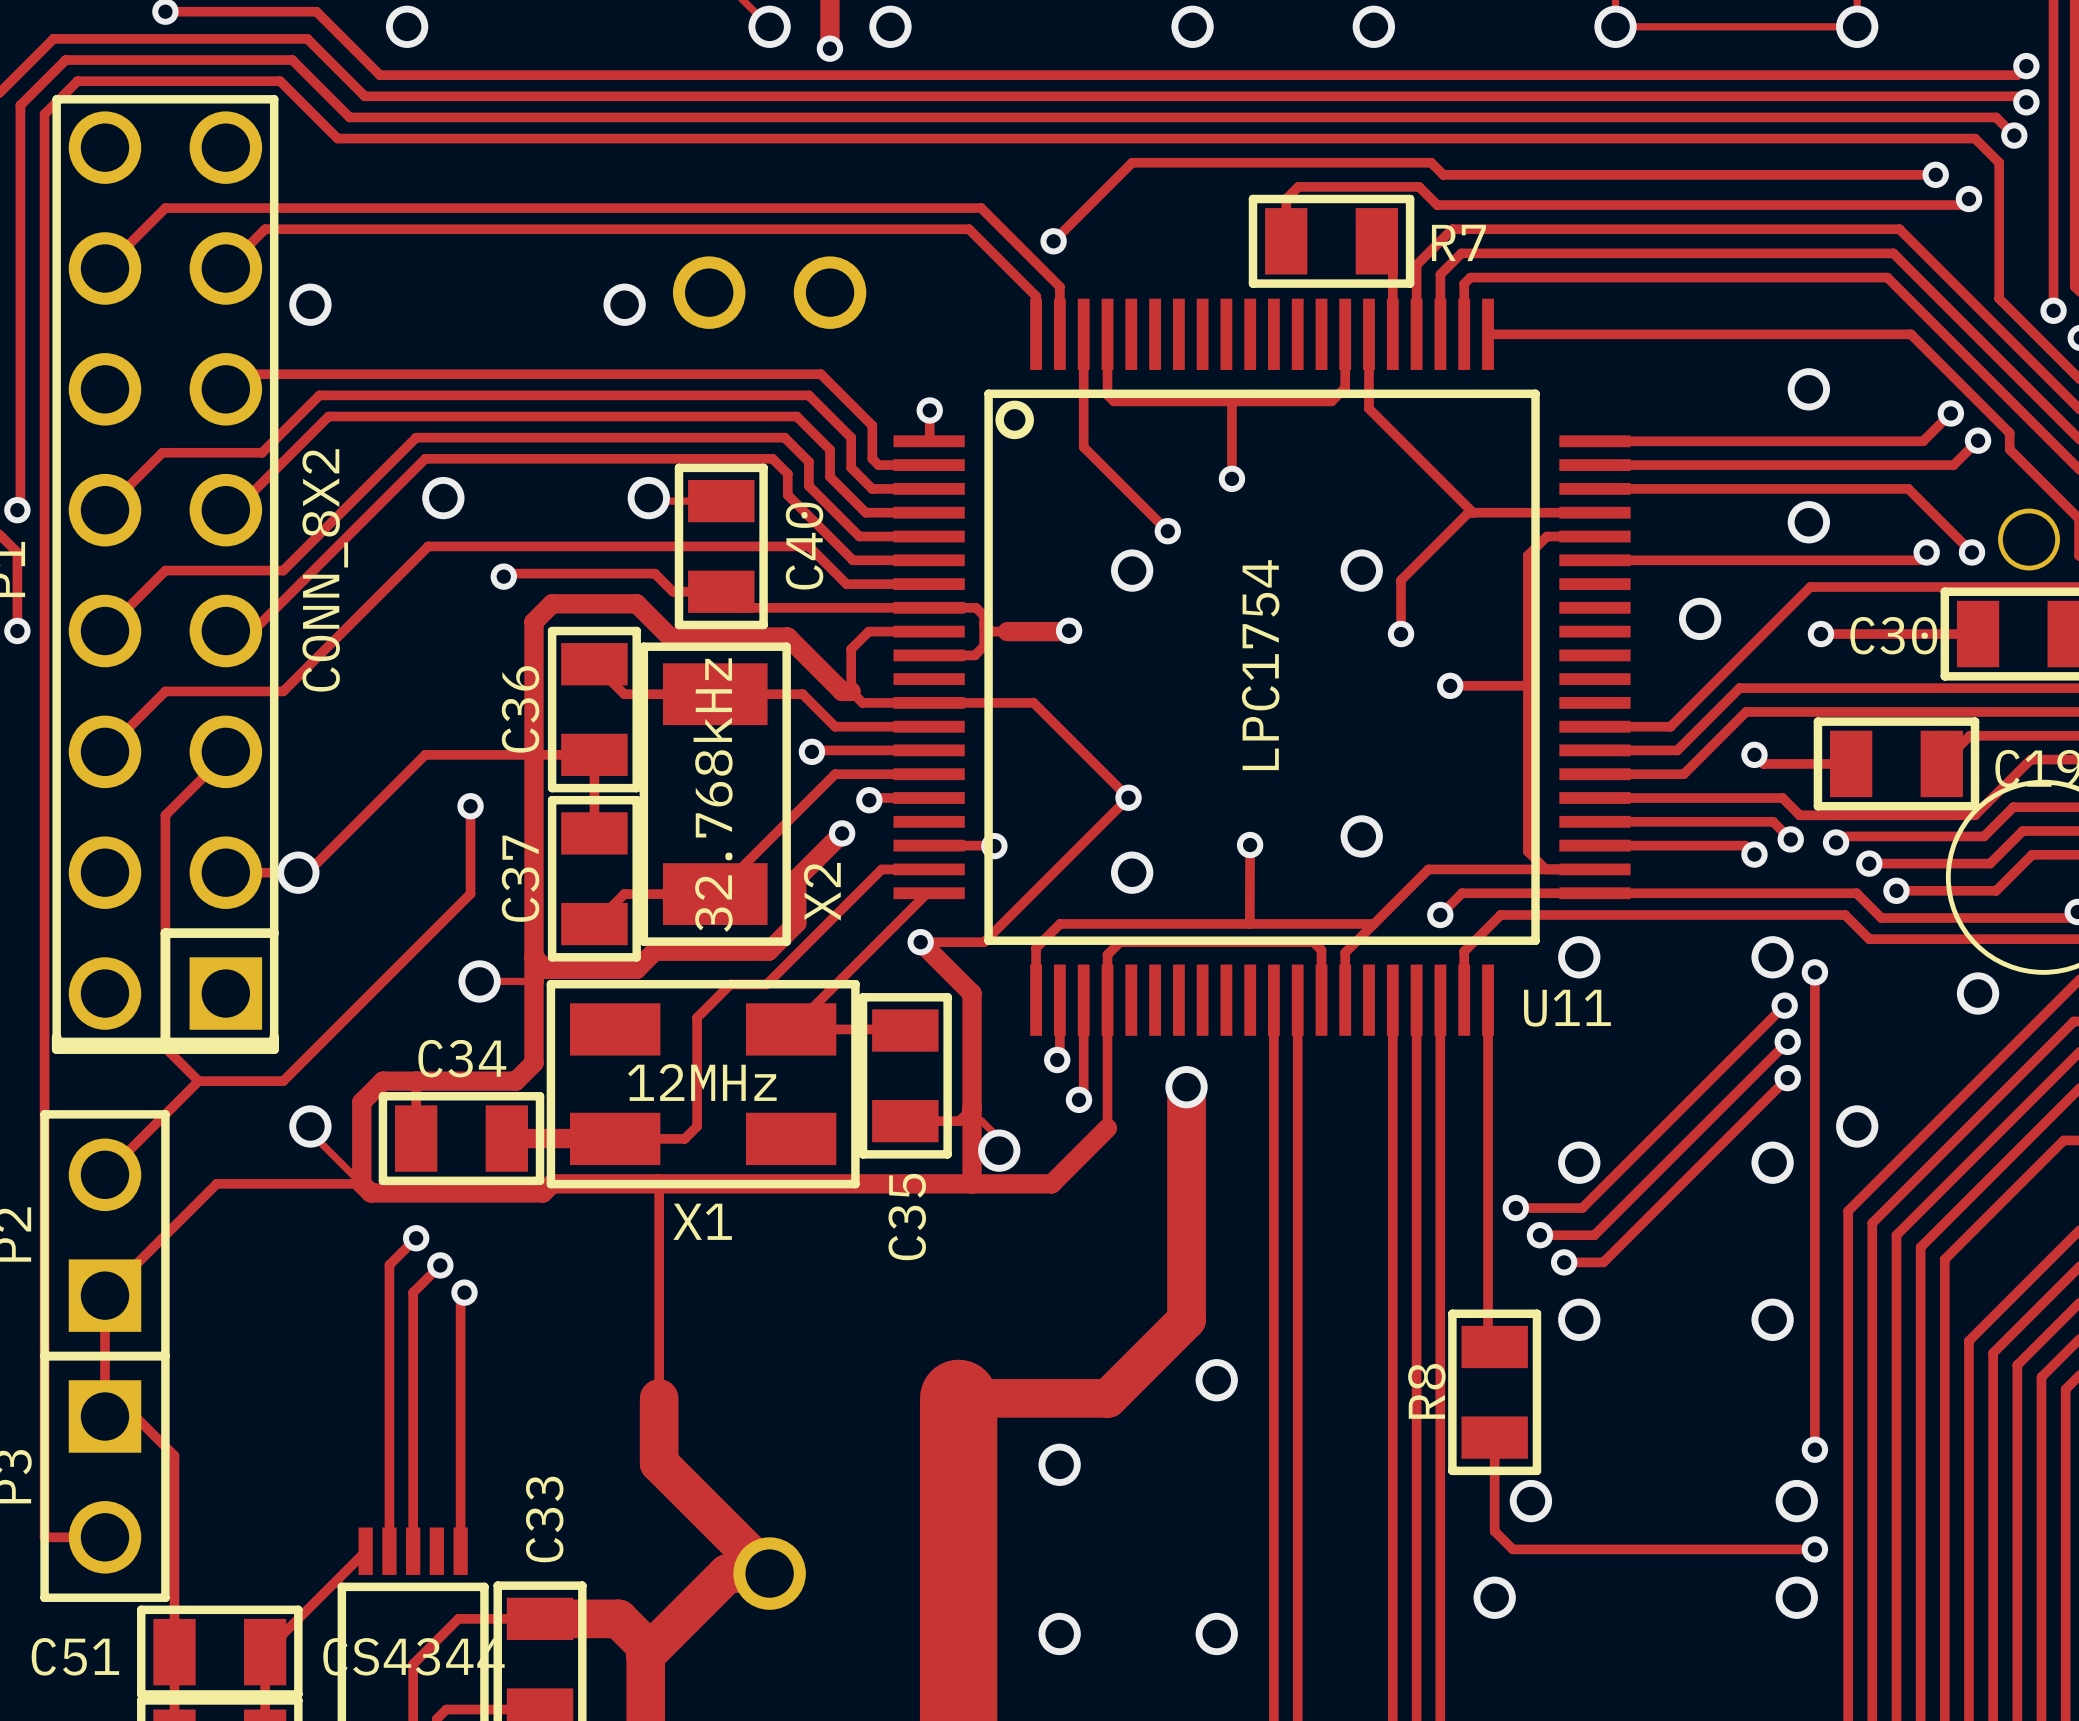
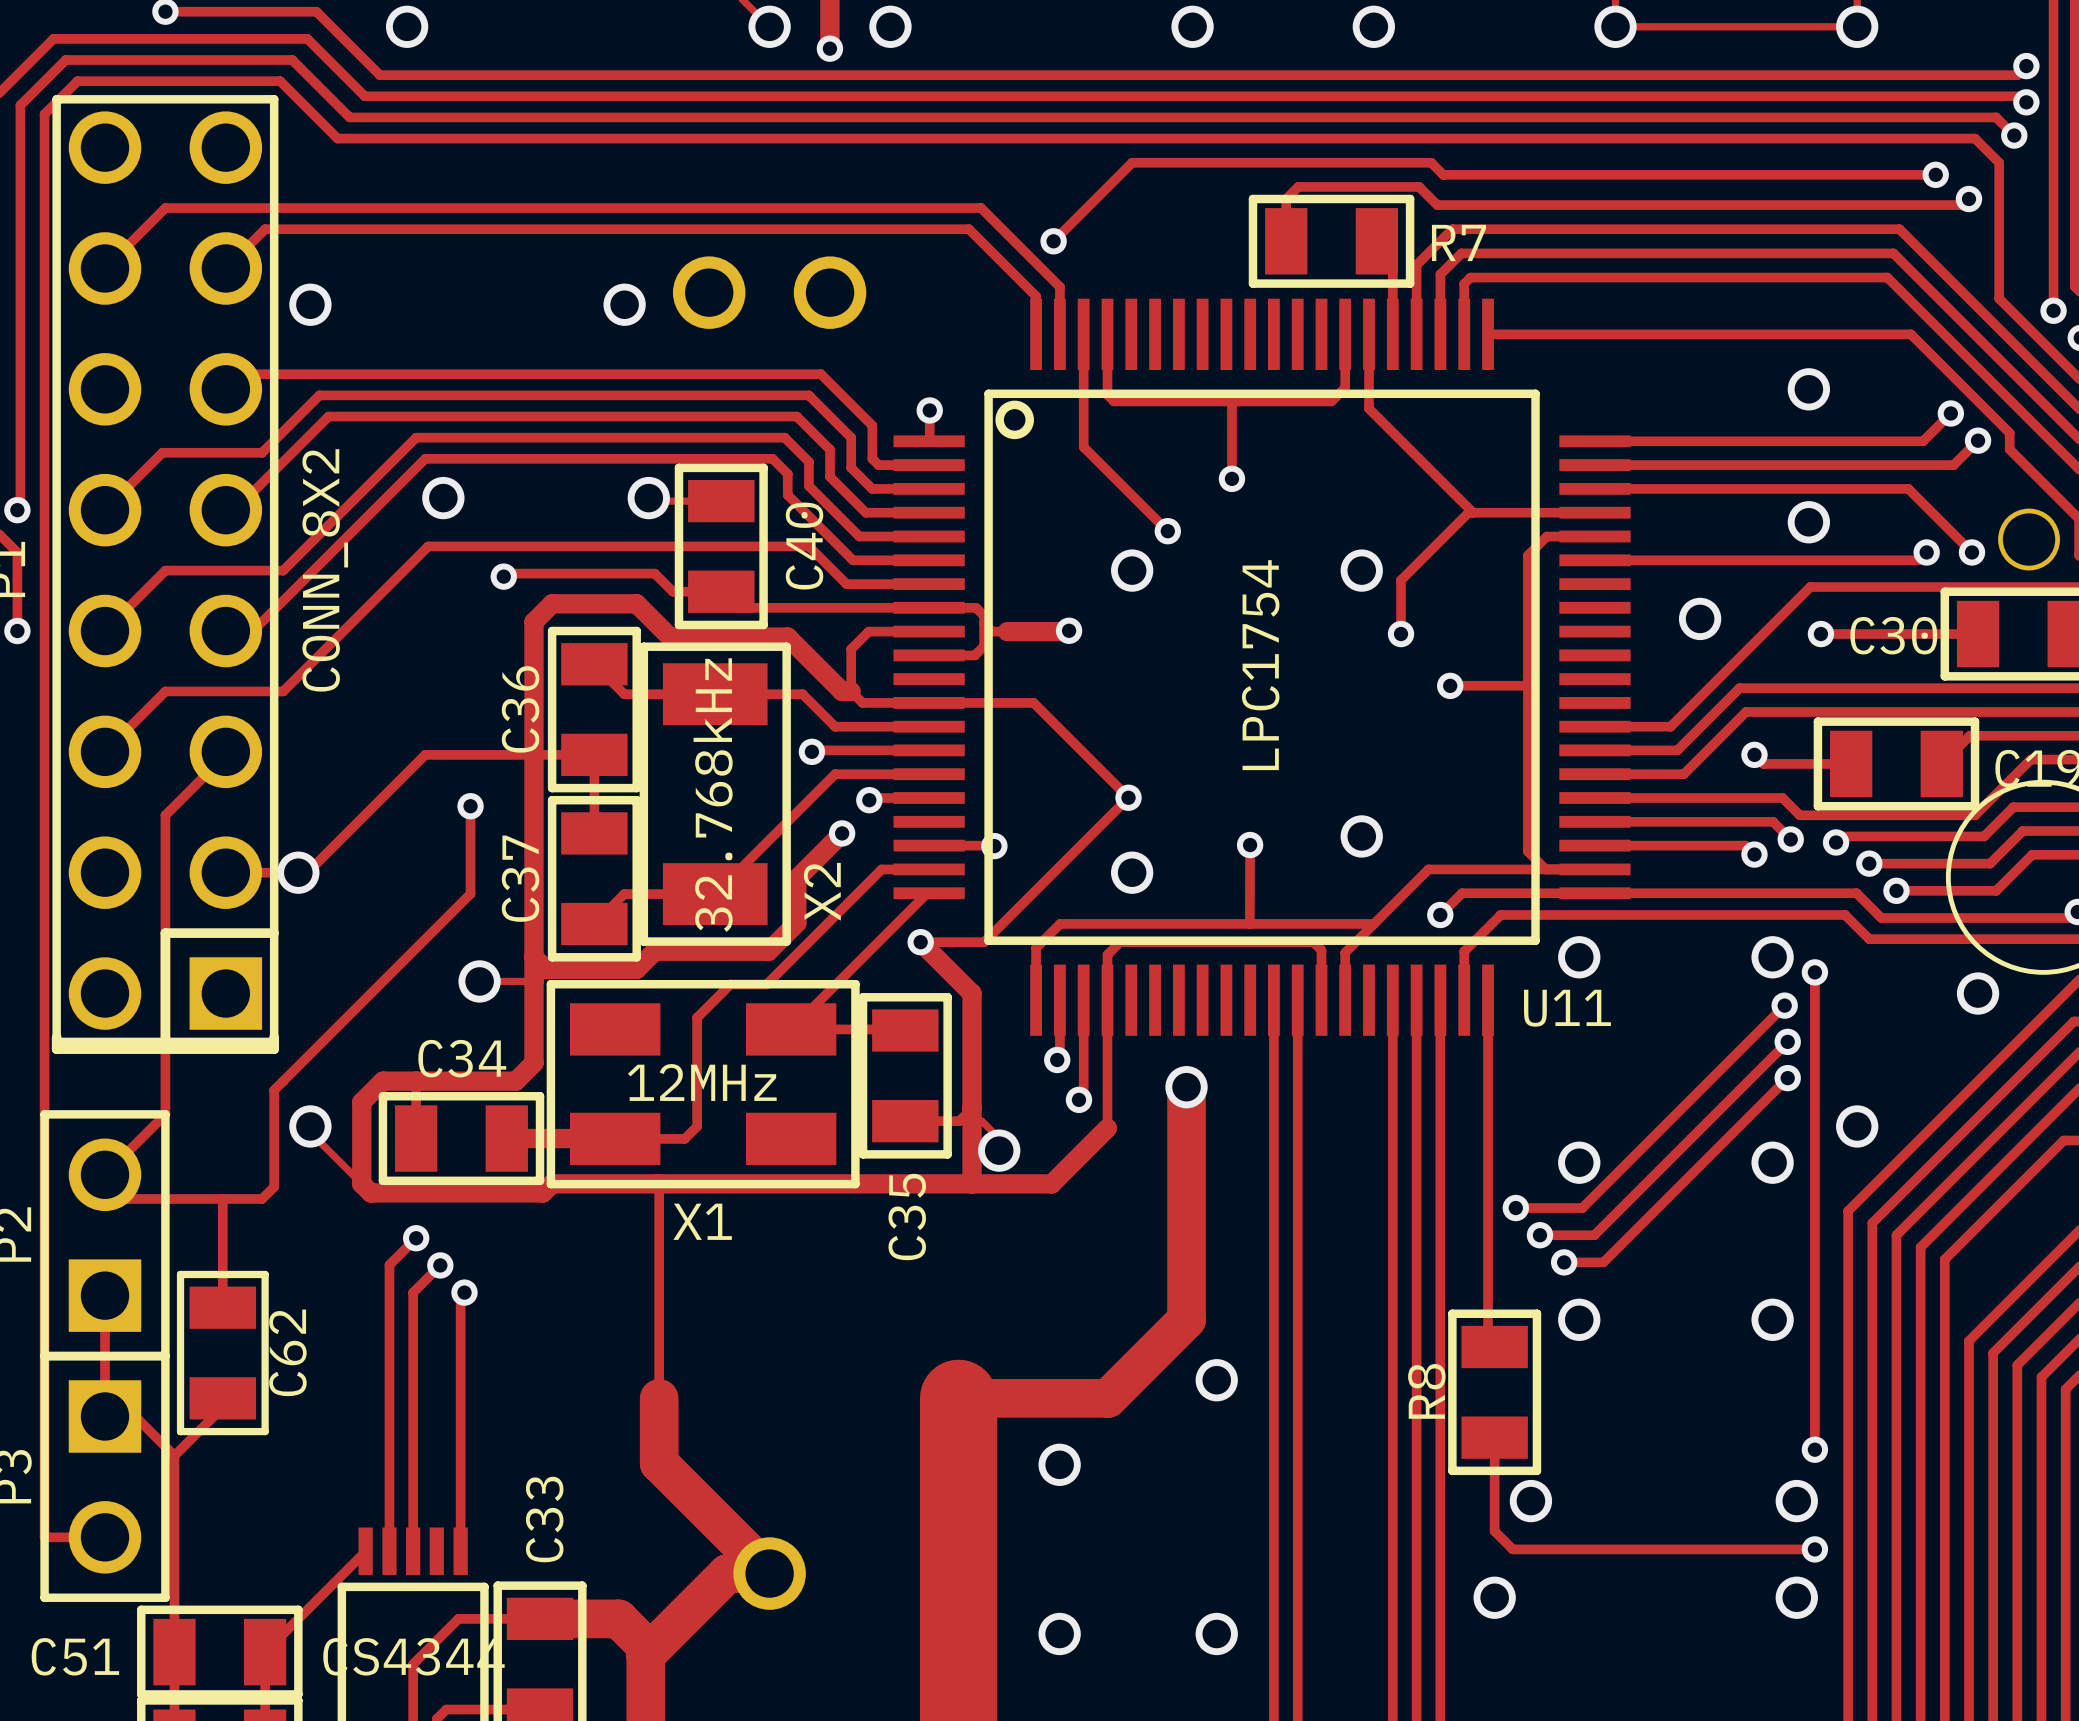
track: (165, 1047) (198, 1081) -> none
track: (198, 1081) (165, 1114) -> (165, 1047) (165, 1114)
track: (198, 1081) (283, 1081) -> (105, 1174) (129, 1198) (262, 1198) (274, 1186) (274, 1090) (283, 1081)
track: (361, 1183) (216, 1183) (105, 1295) -> none
track: none -> (222, 1198) (222, 1307)
C62: none -> (222, 1353)
track: none -> (222, 1398) (222, 1407) (174, 1455)

